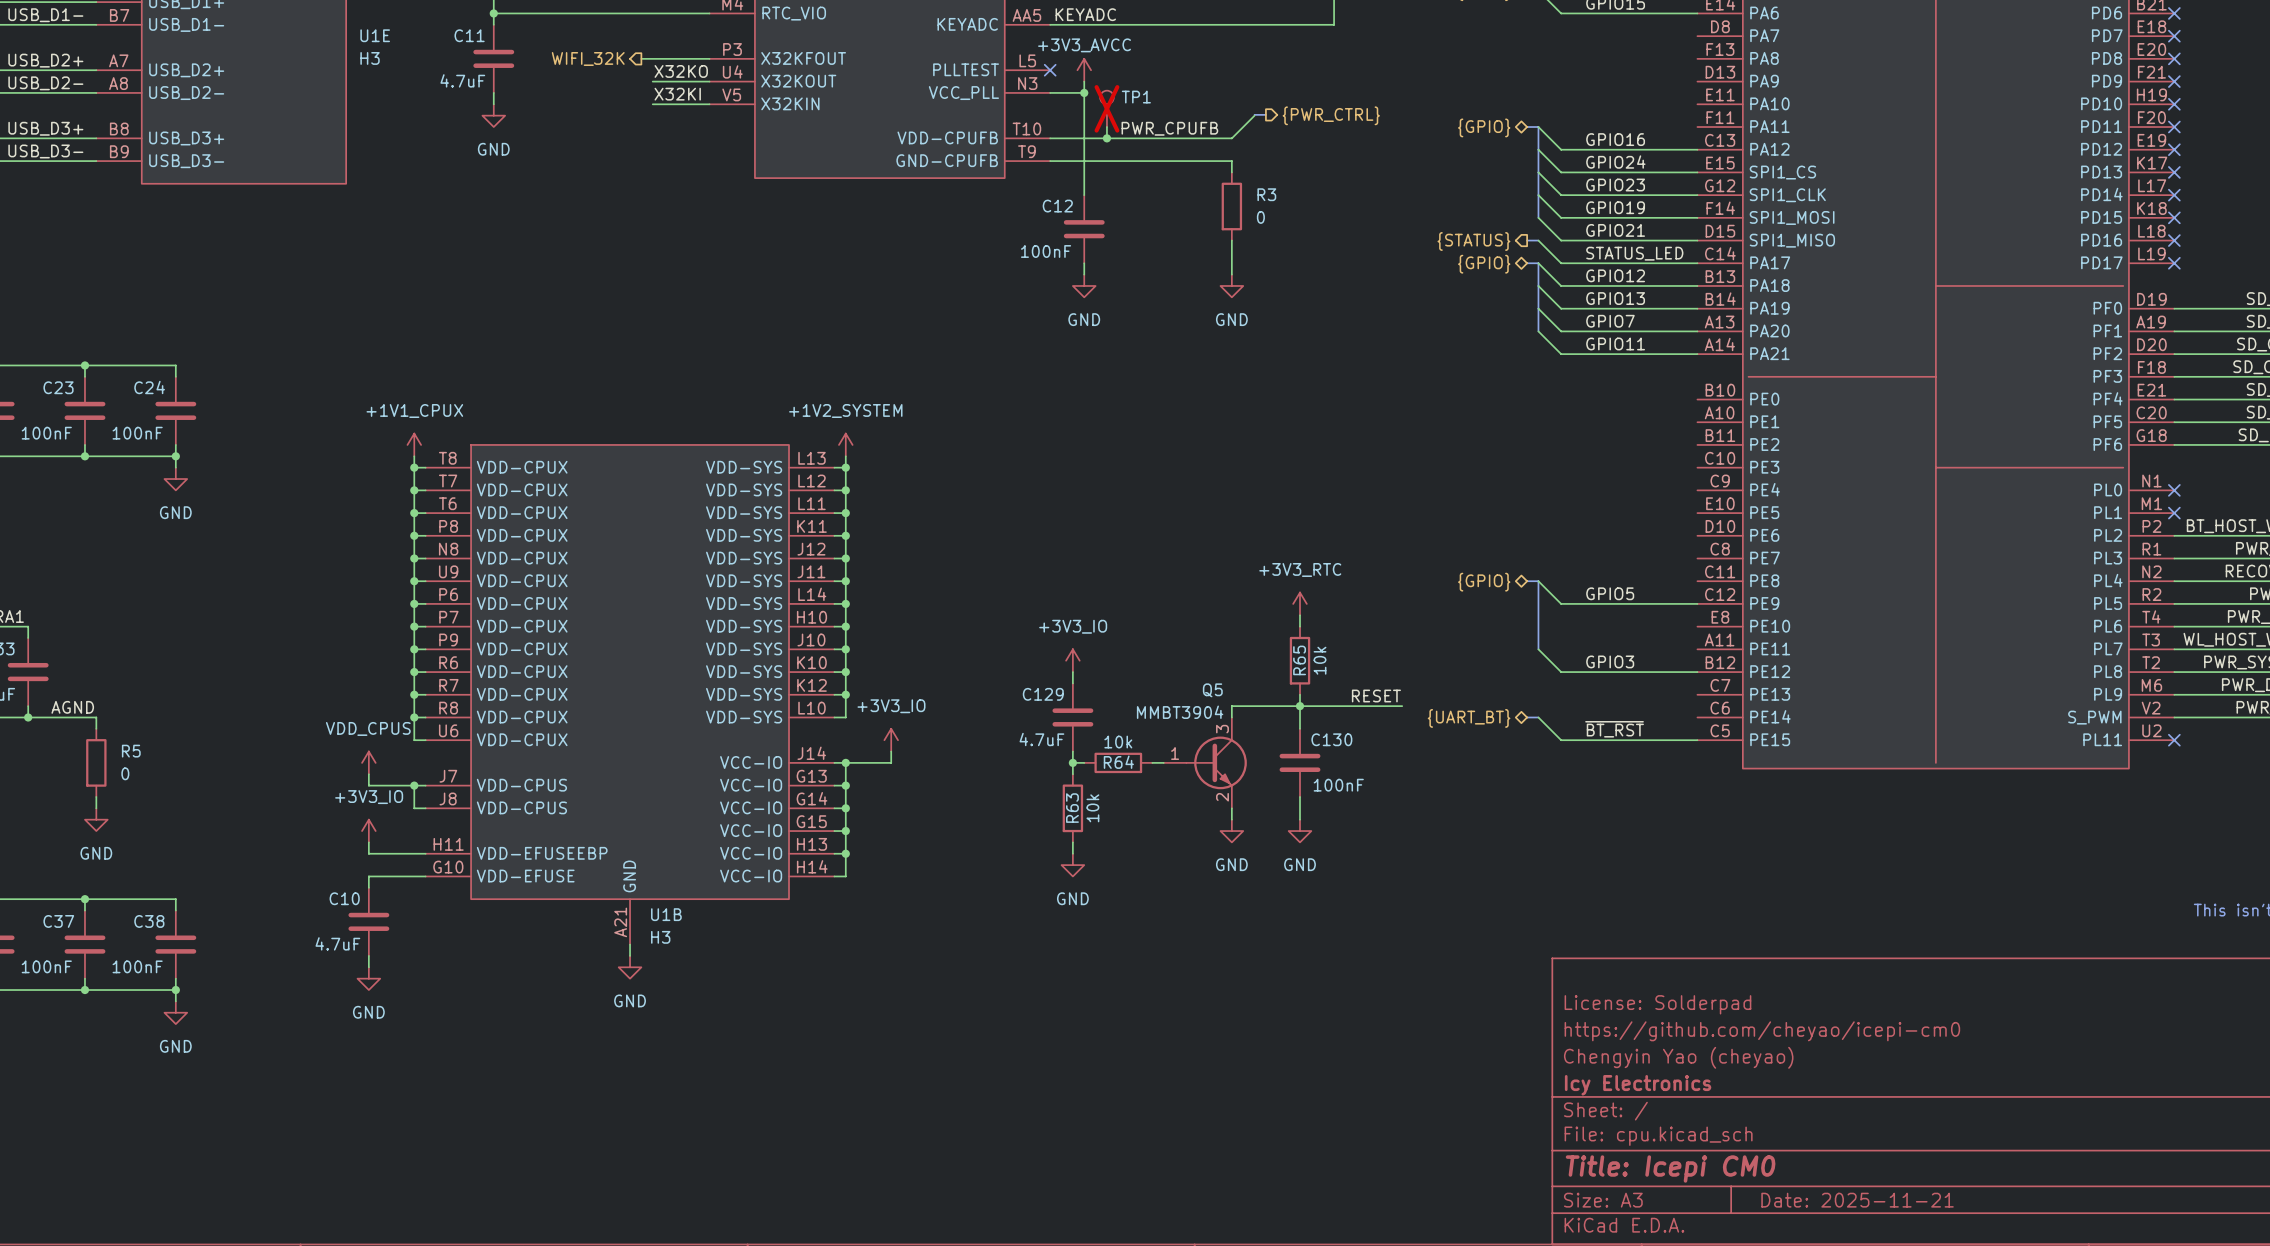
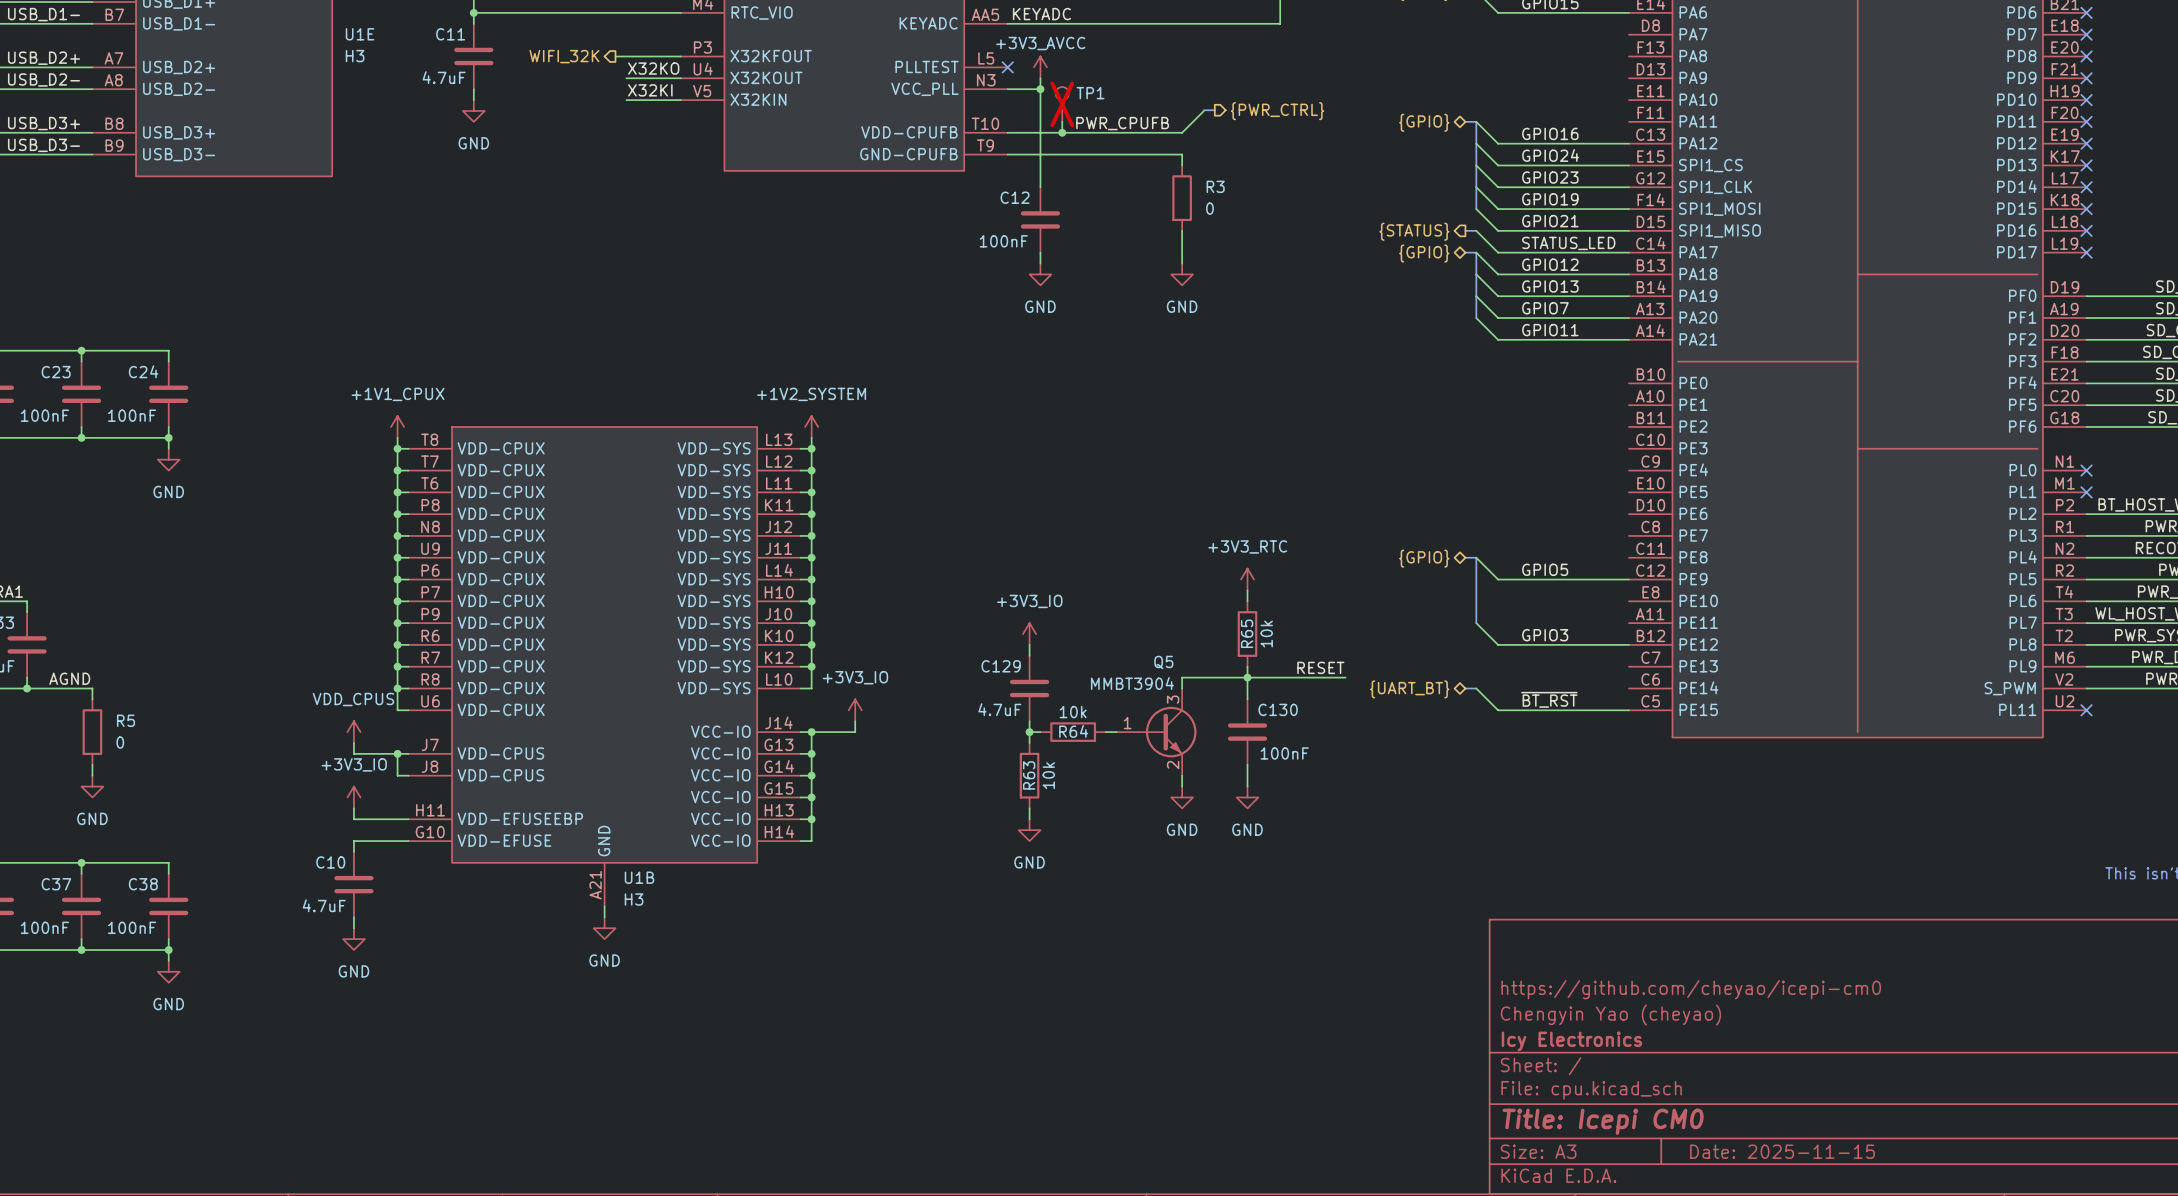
title block: License: Solderpad (1657, 1004) -> none
title block: Date: 2025-11-21 (1857, 1200) -> Date: 2025-11-15 (1782, 1151)

